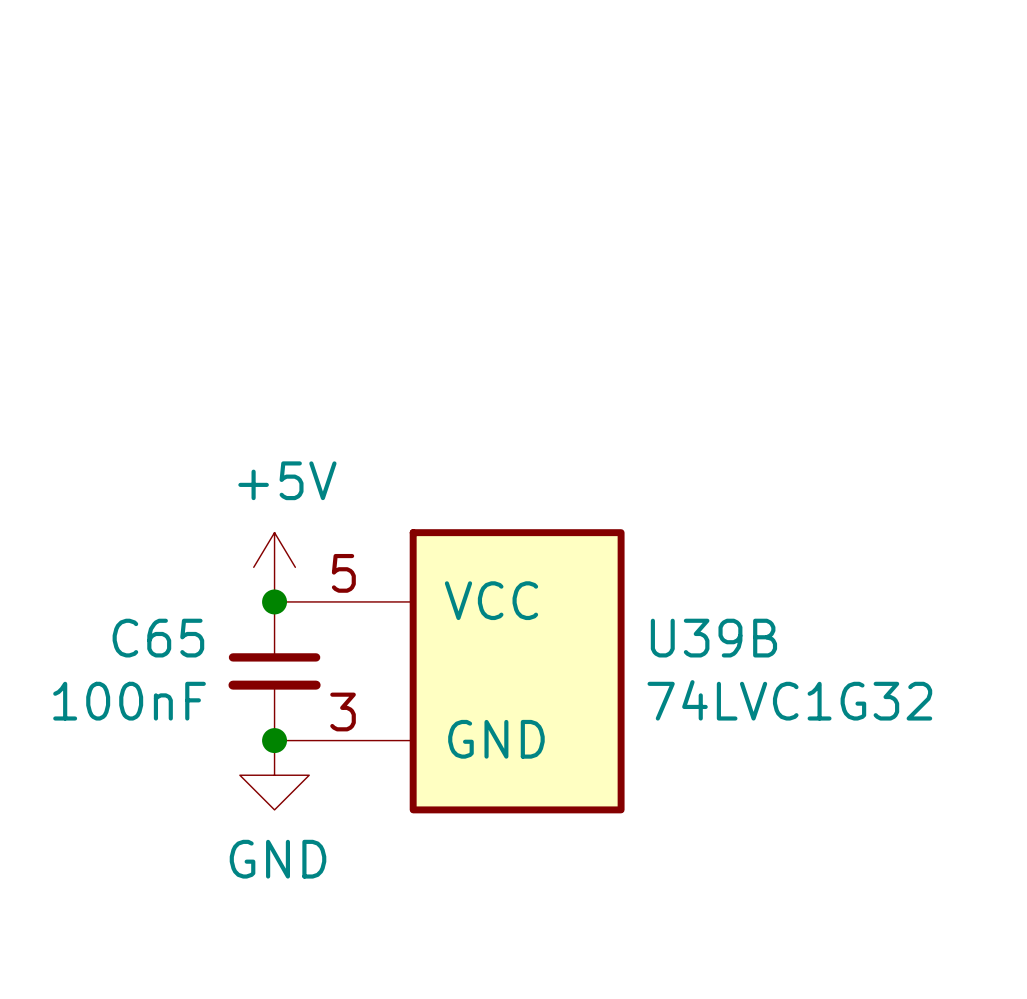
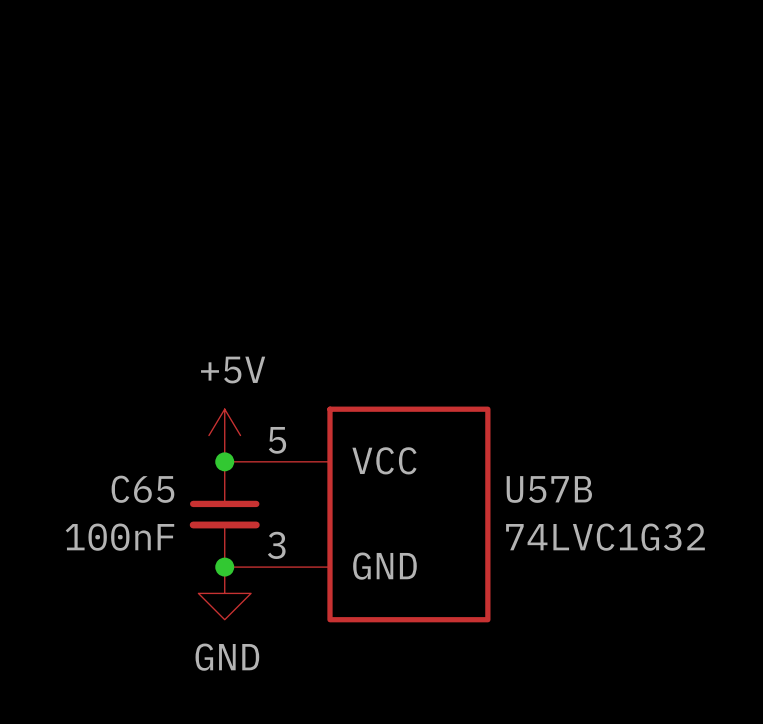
U39B name: U39B (713, 638) -> U57B (549, 489)

